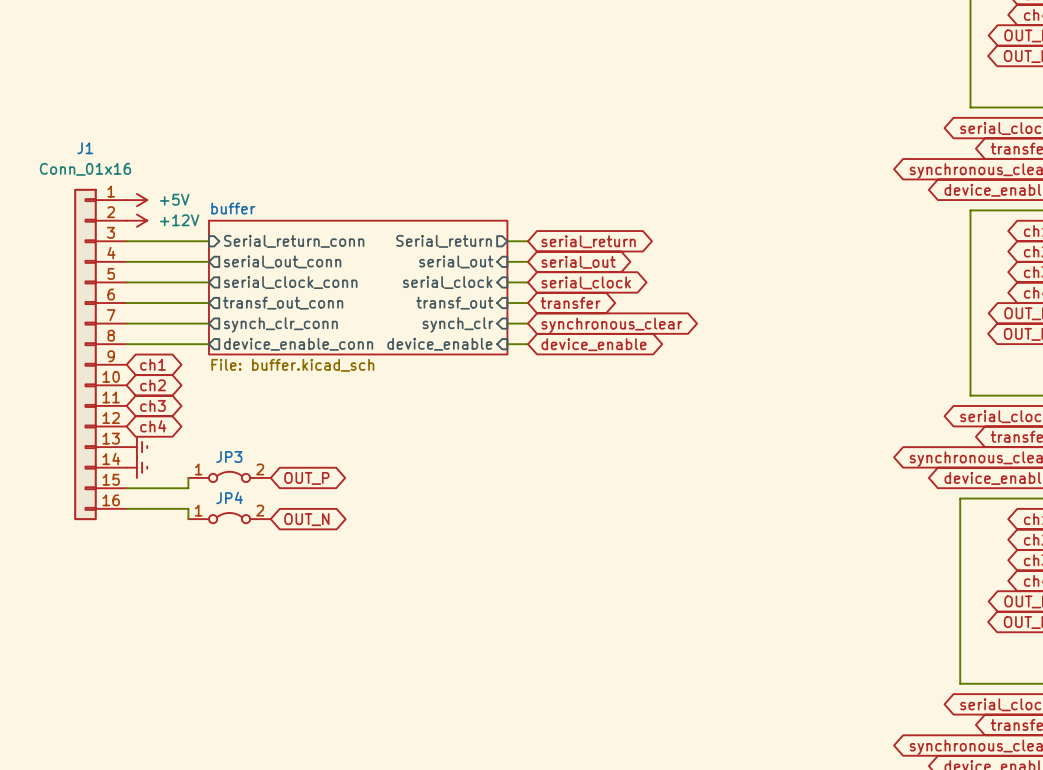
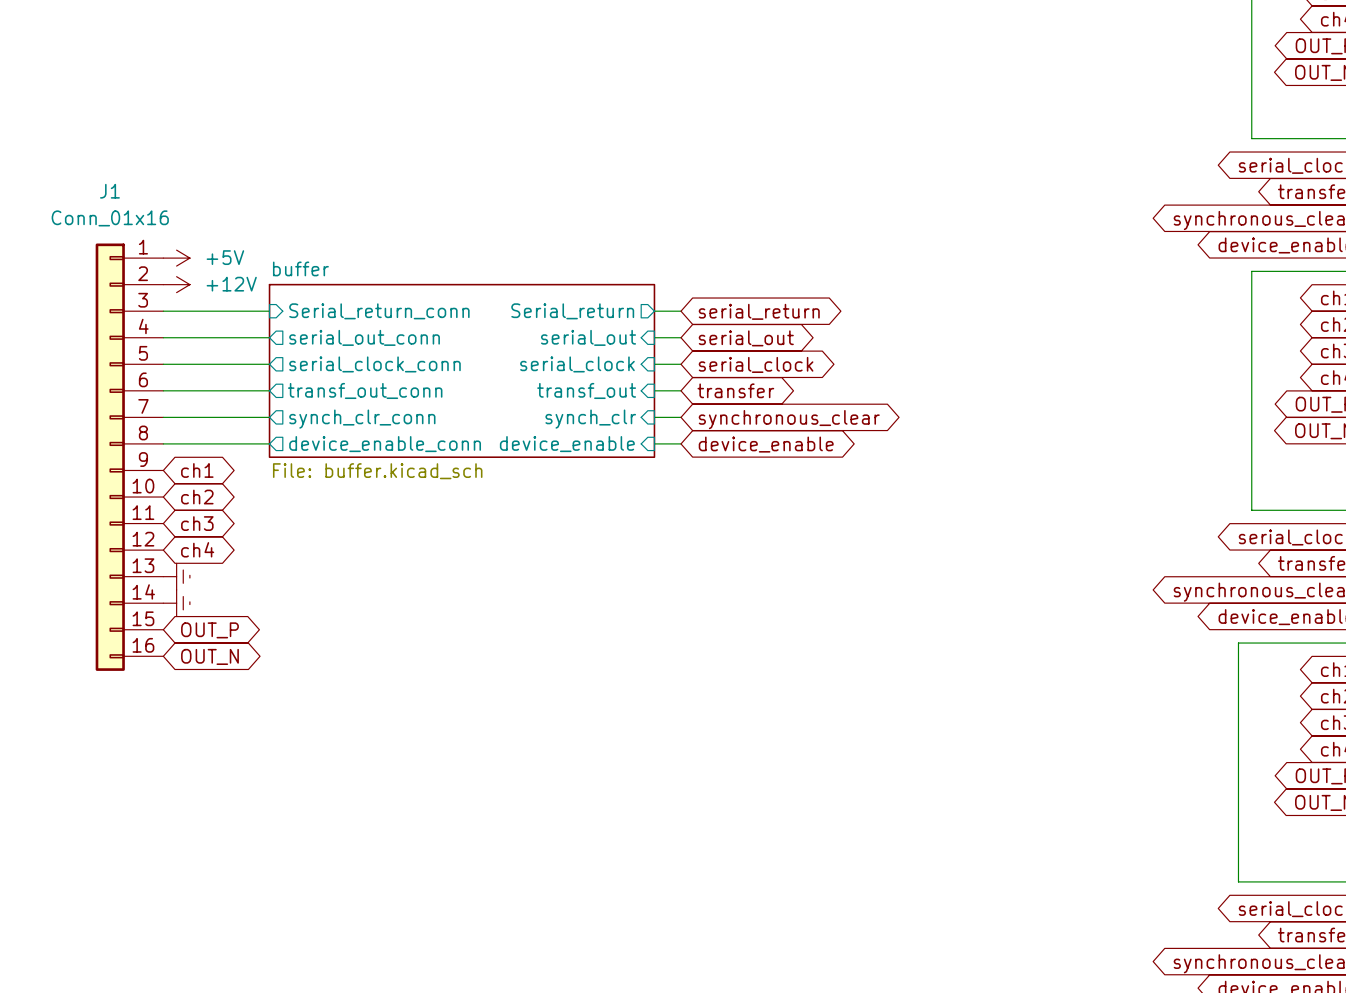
JP3: (229, 476) -> none
wire: (188, 477) (188, 488) (126, 488) -> none
global label position: OUT_P (306, 478) -> OUT_P (209, 630)
wire: (126, 508) (188, 508) (188, 519) -> none
JP4: (229, 518) -> none
global label position: OUT_N (306, 519) -> OUT_N (209, 656)

